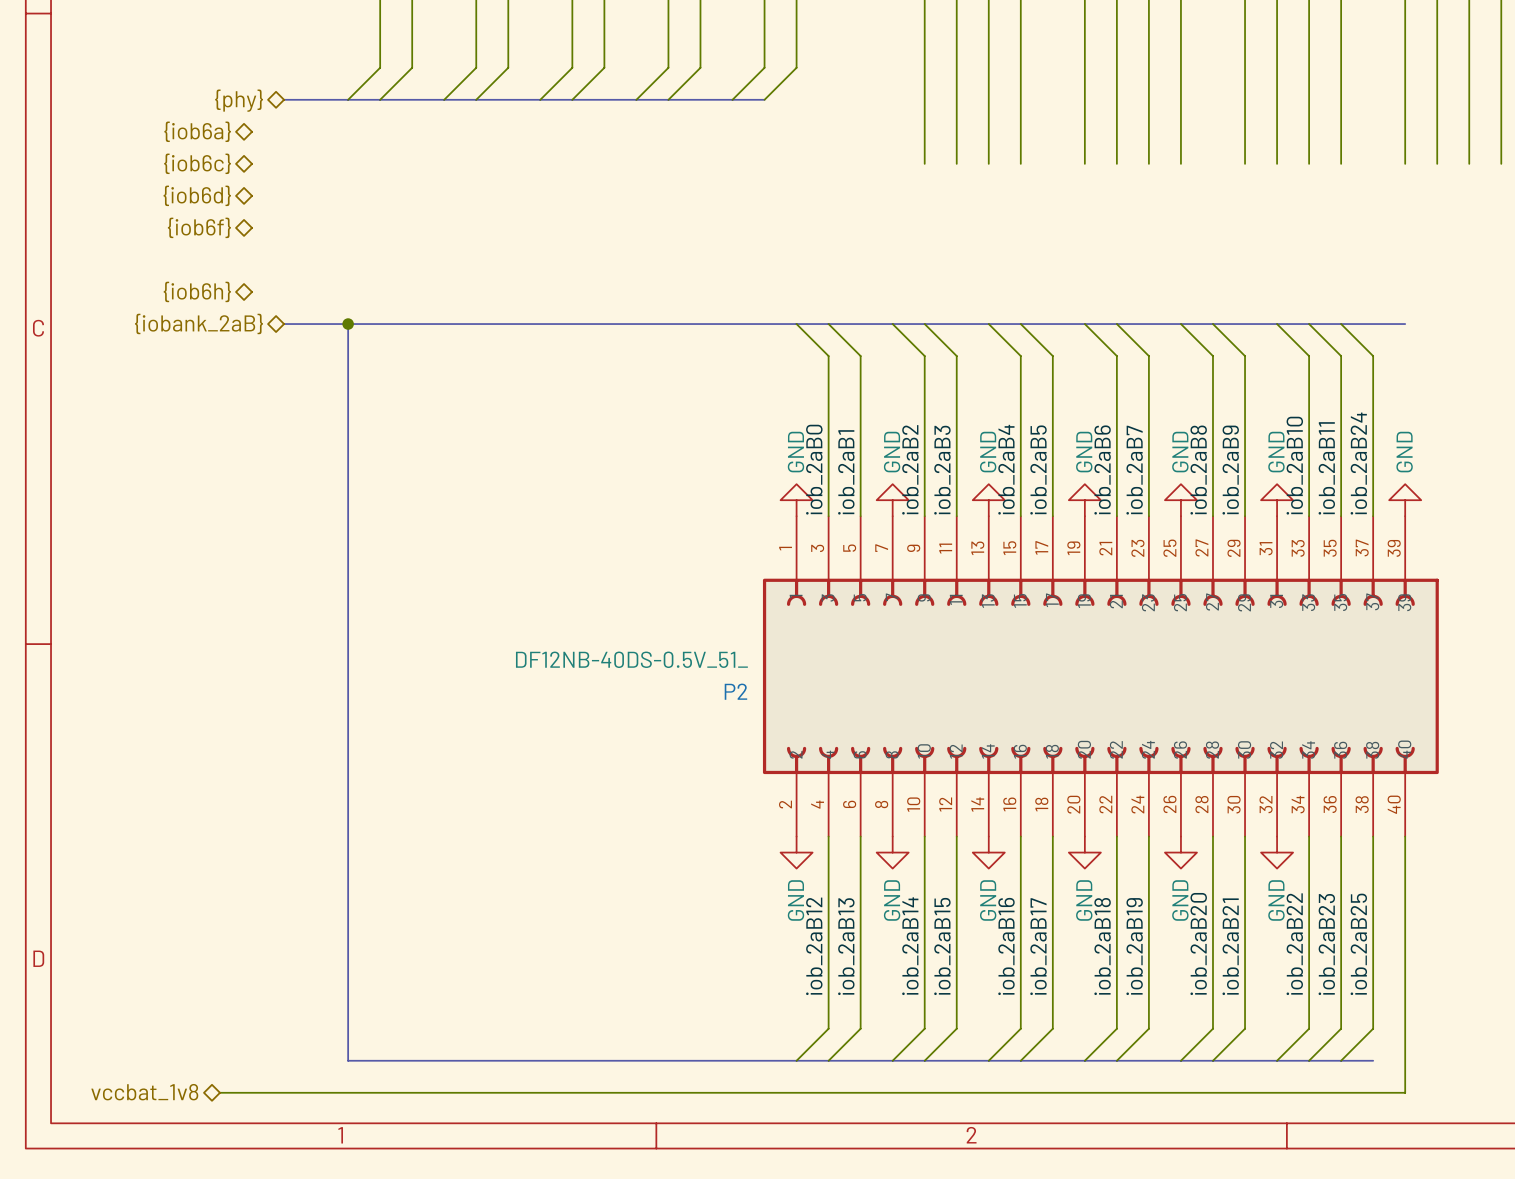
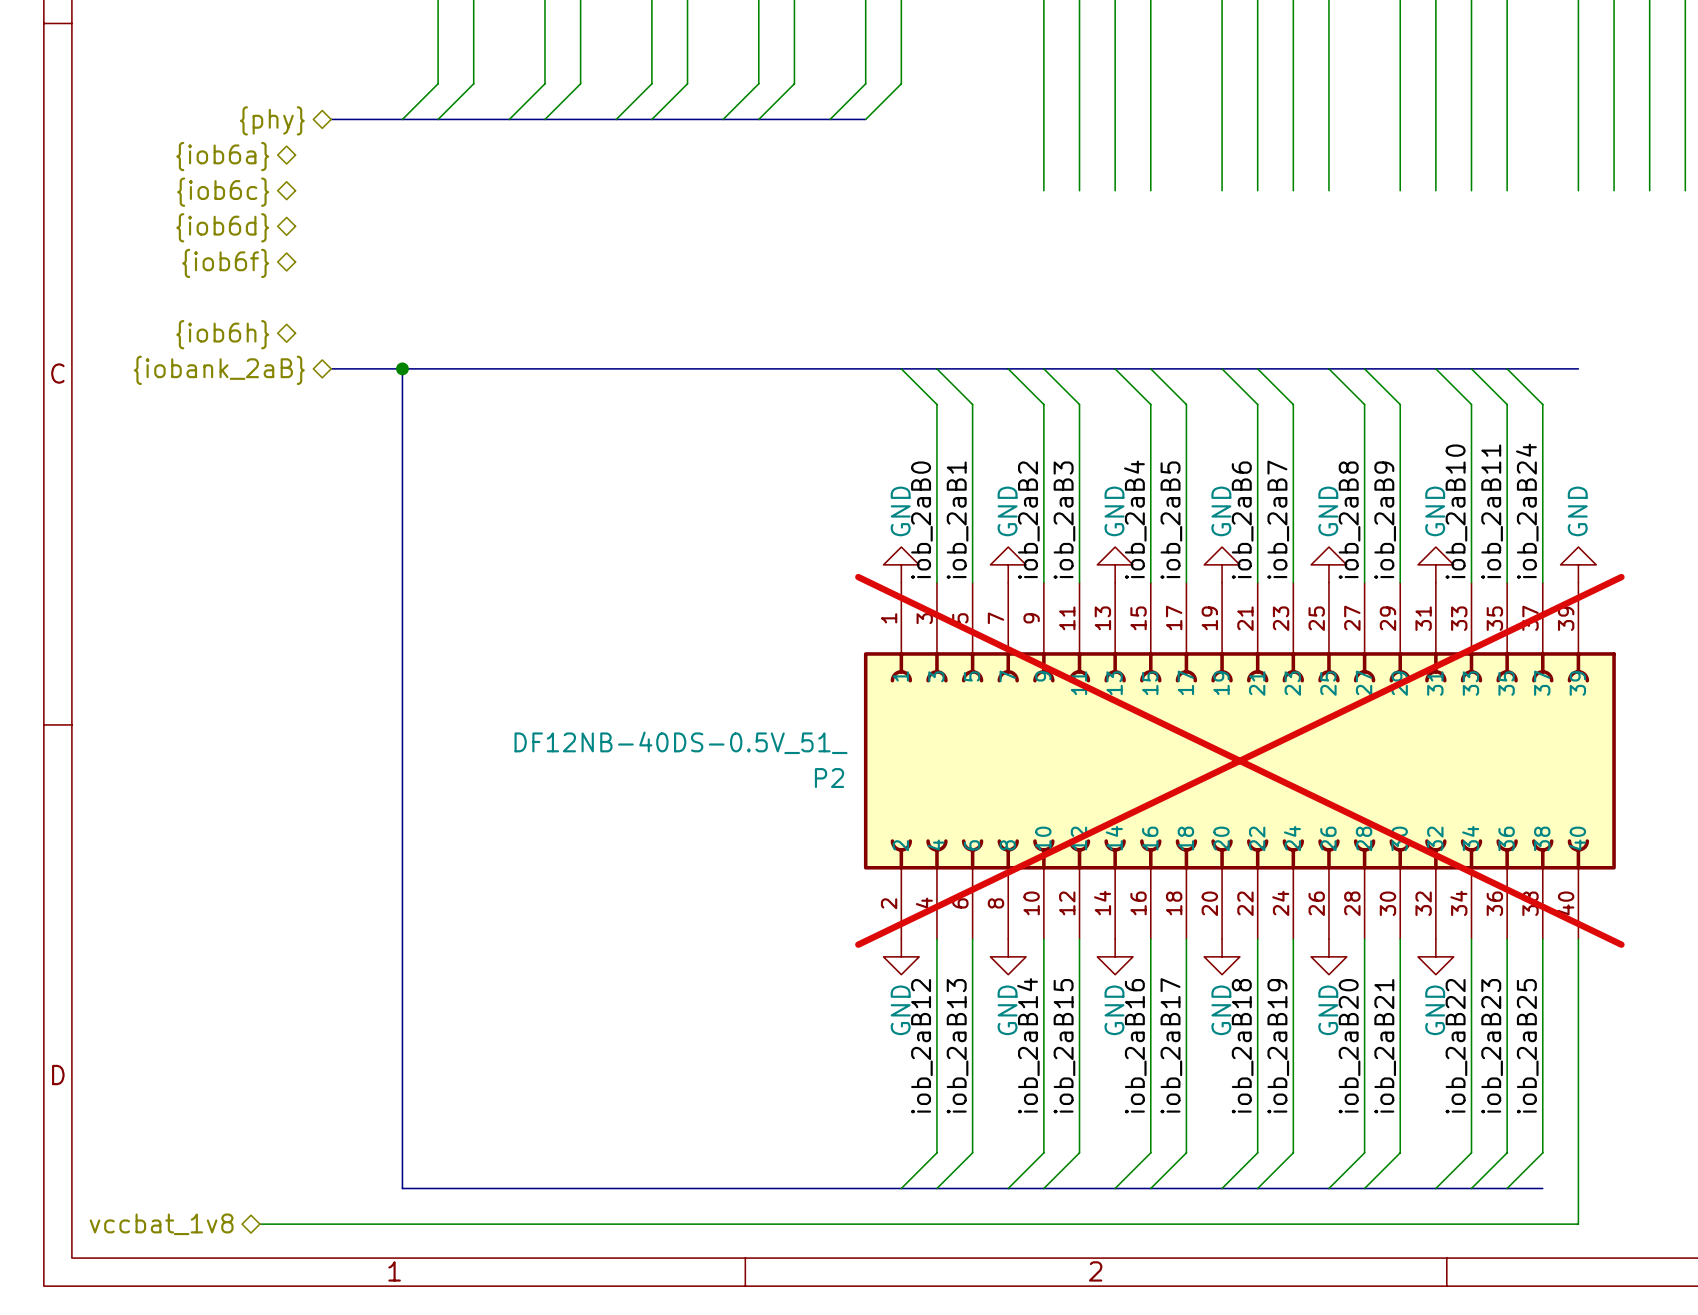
P2 do-not-place cross: none -> (1239, 760)

